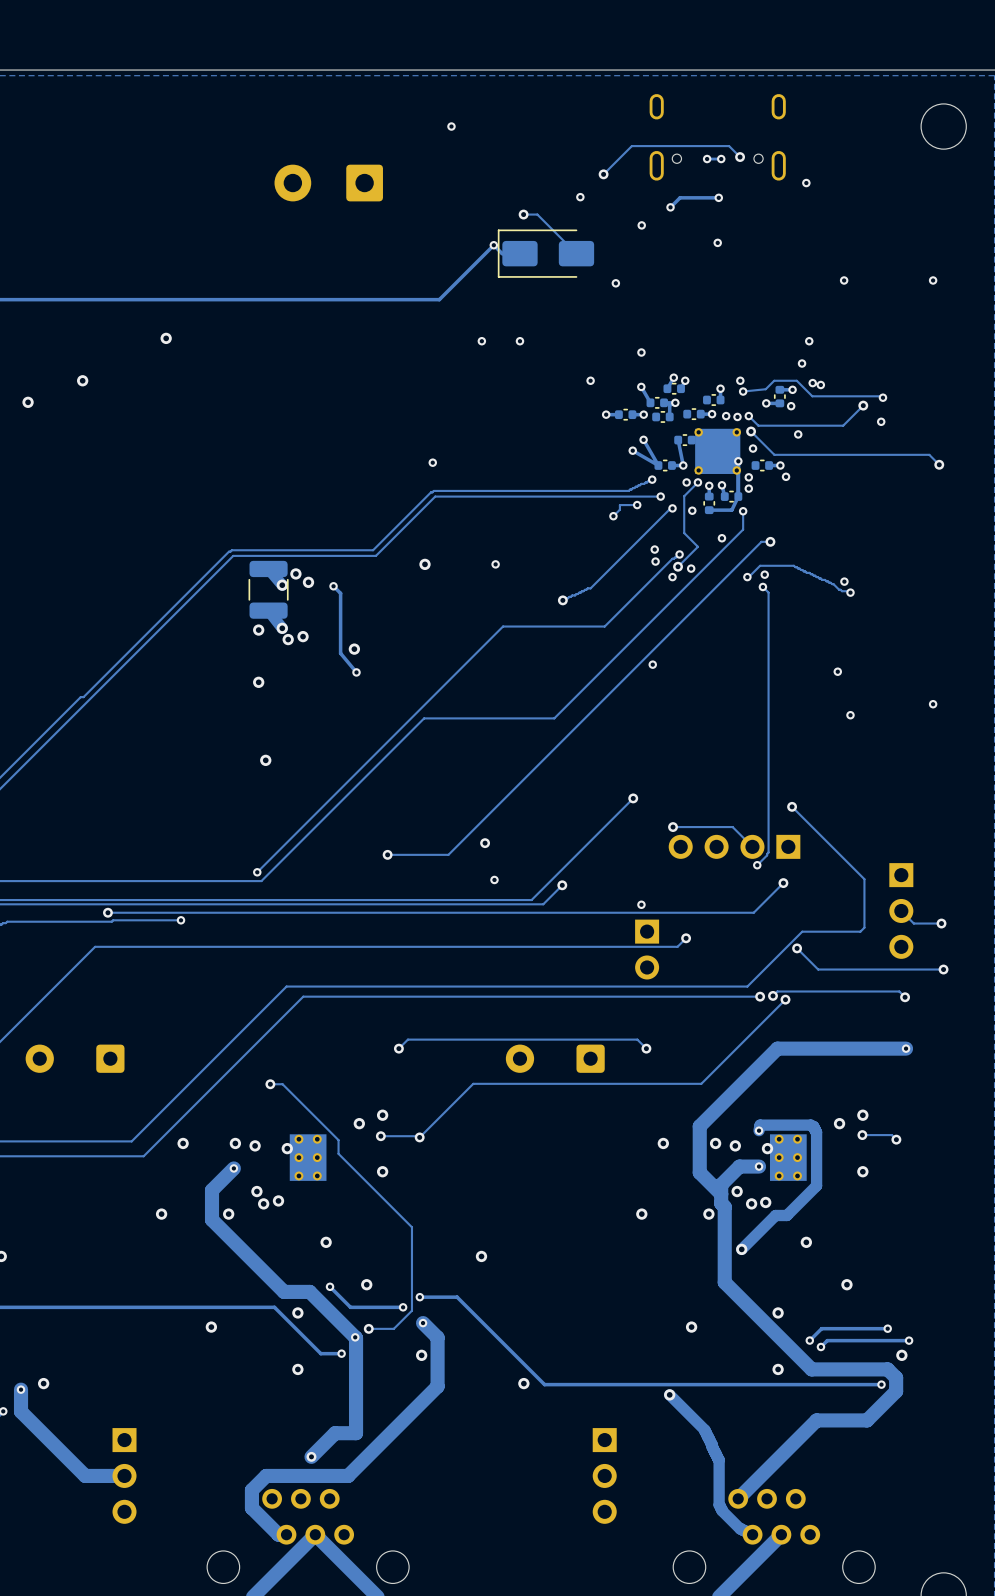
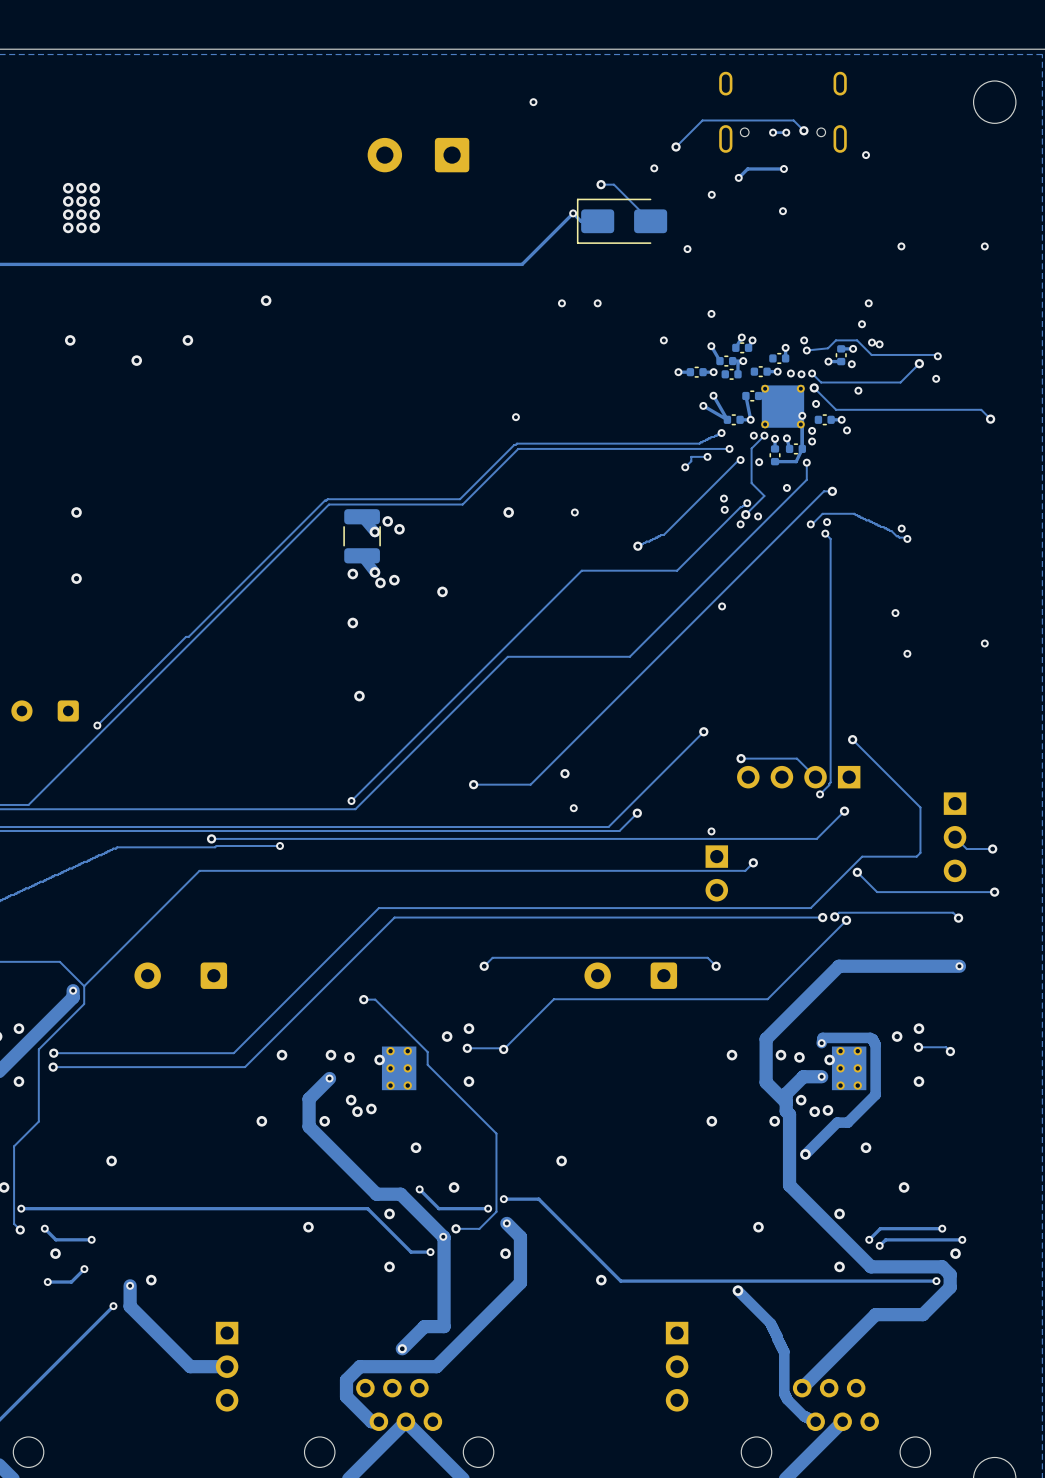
track: (333, 586) (340, 593) (340, 653) (356, 672) -> none
via: (333, 586) -> none
via: (356, 672) -> none

